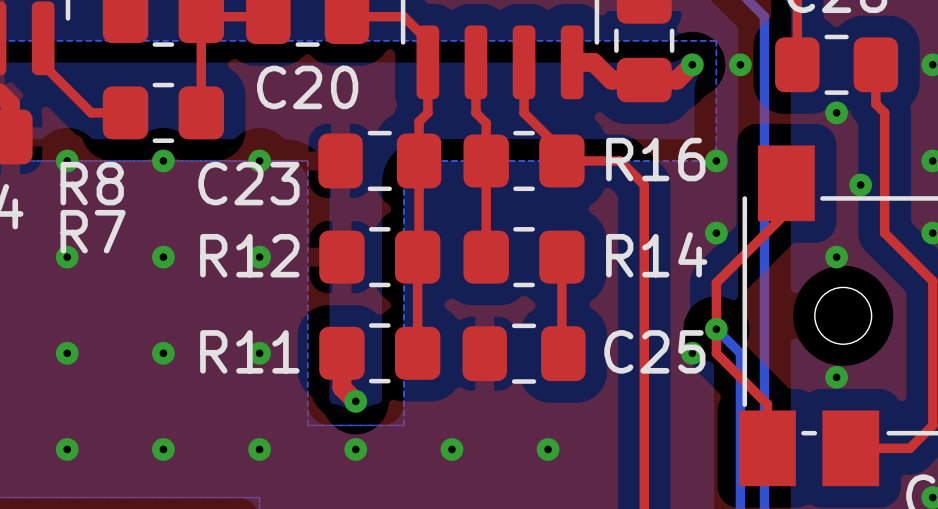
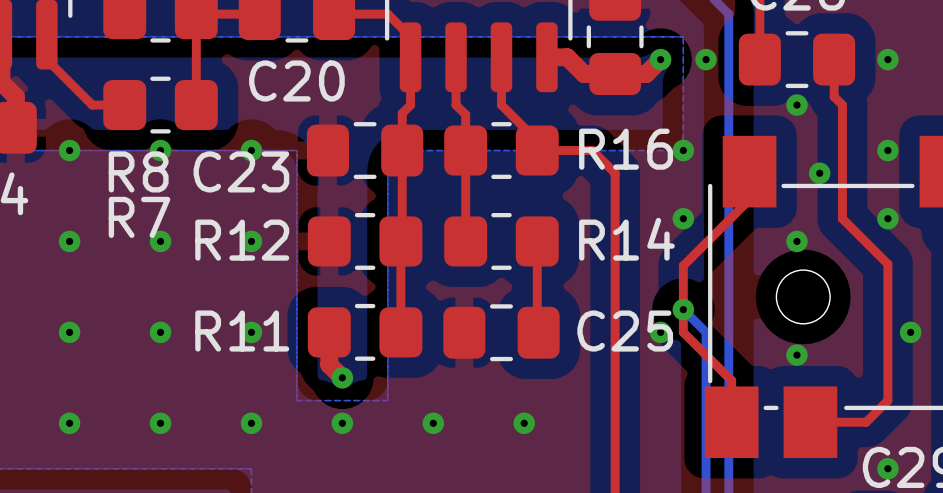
R8 name position: R8 (92, 183) -> R8 (138, 171)
R7 name position: R7 (93, 231) -> R7 (139, 217)

